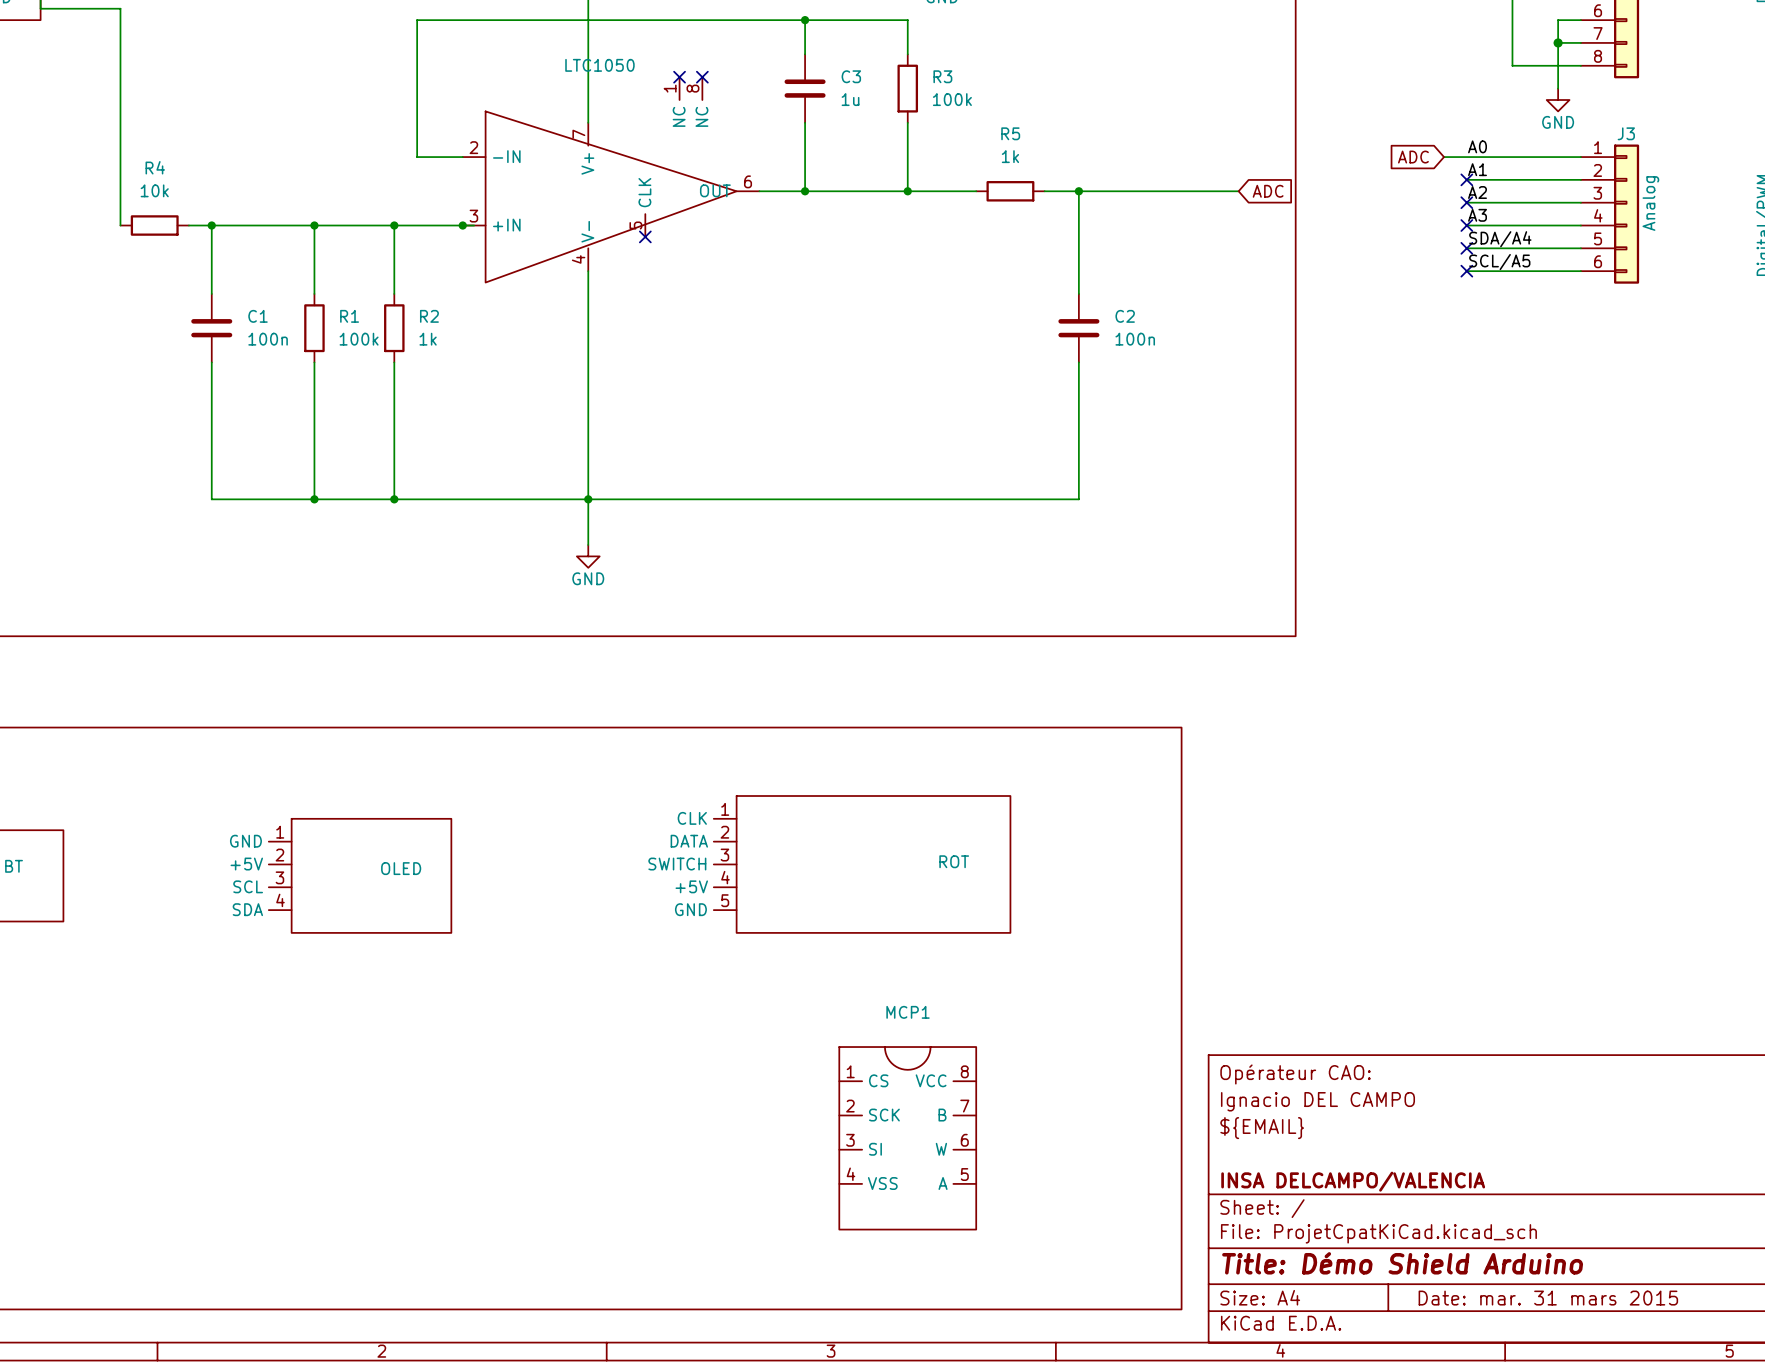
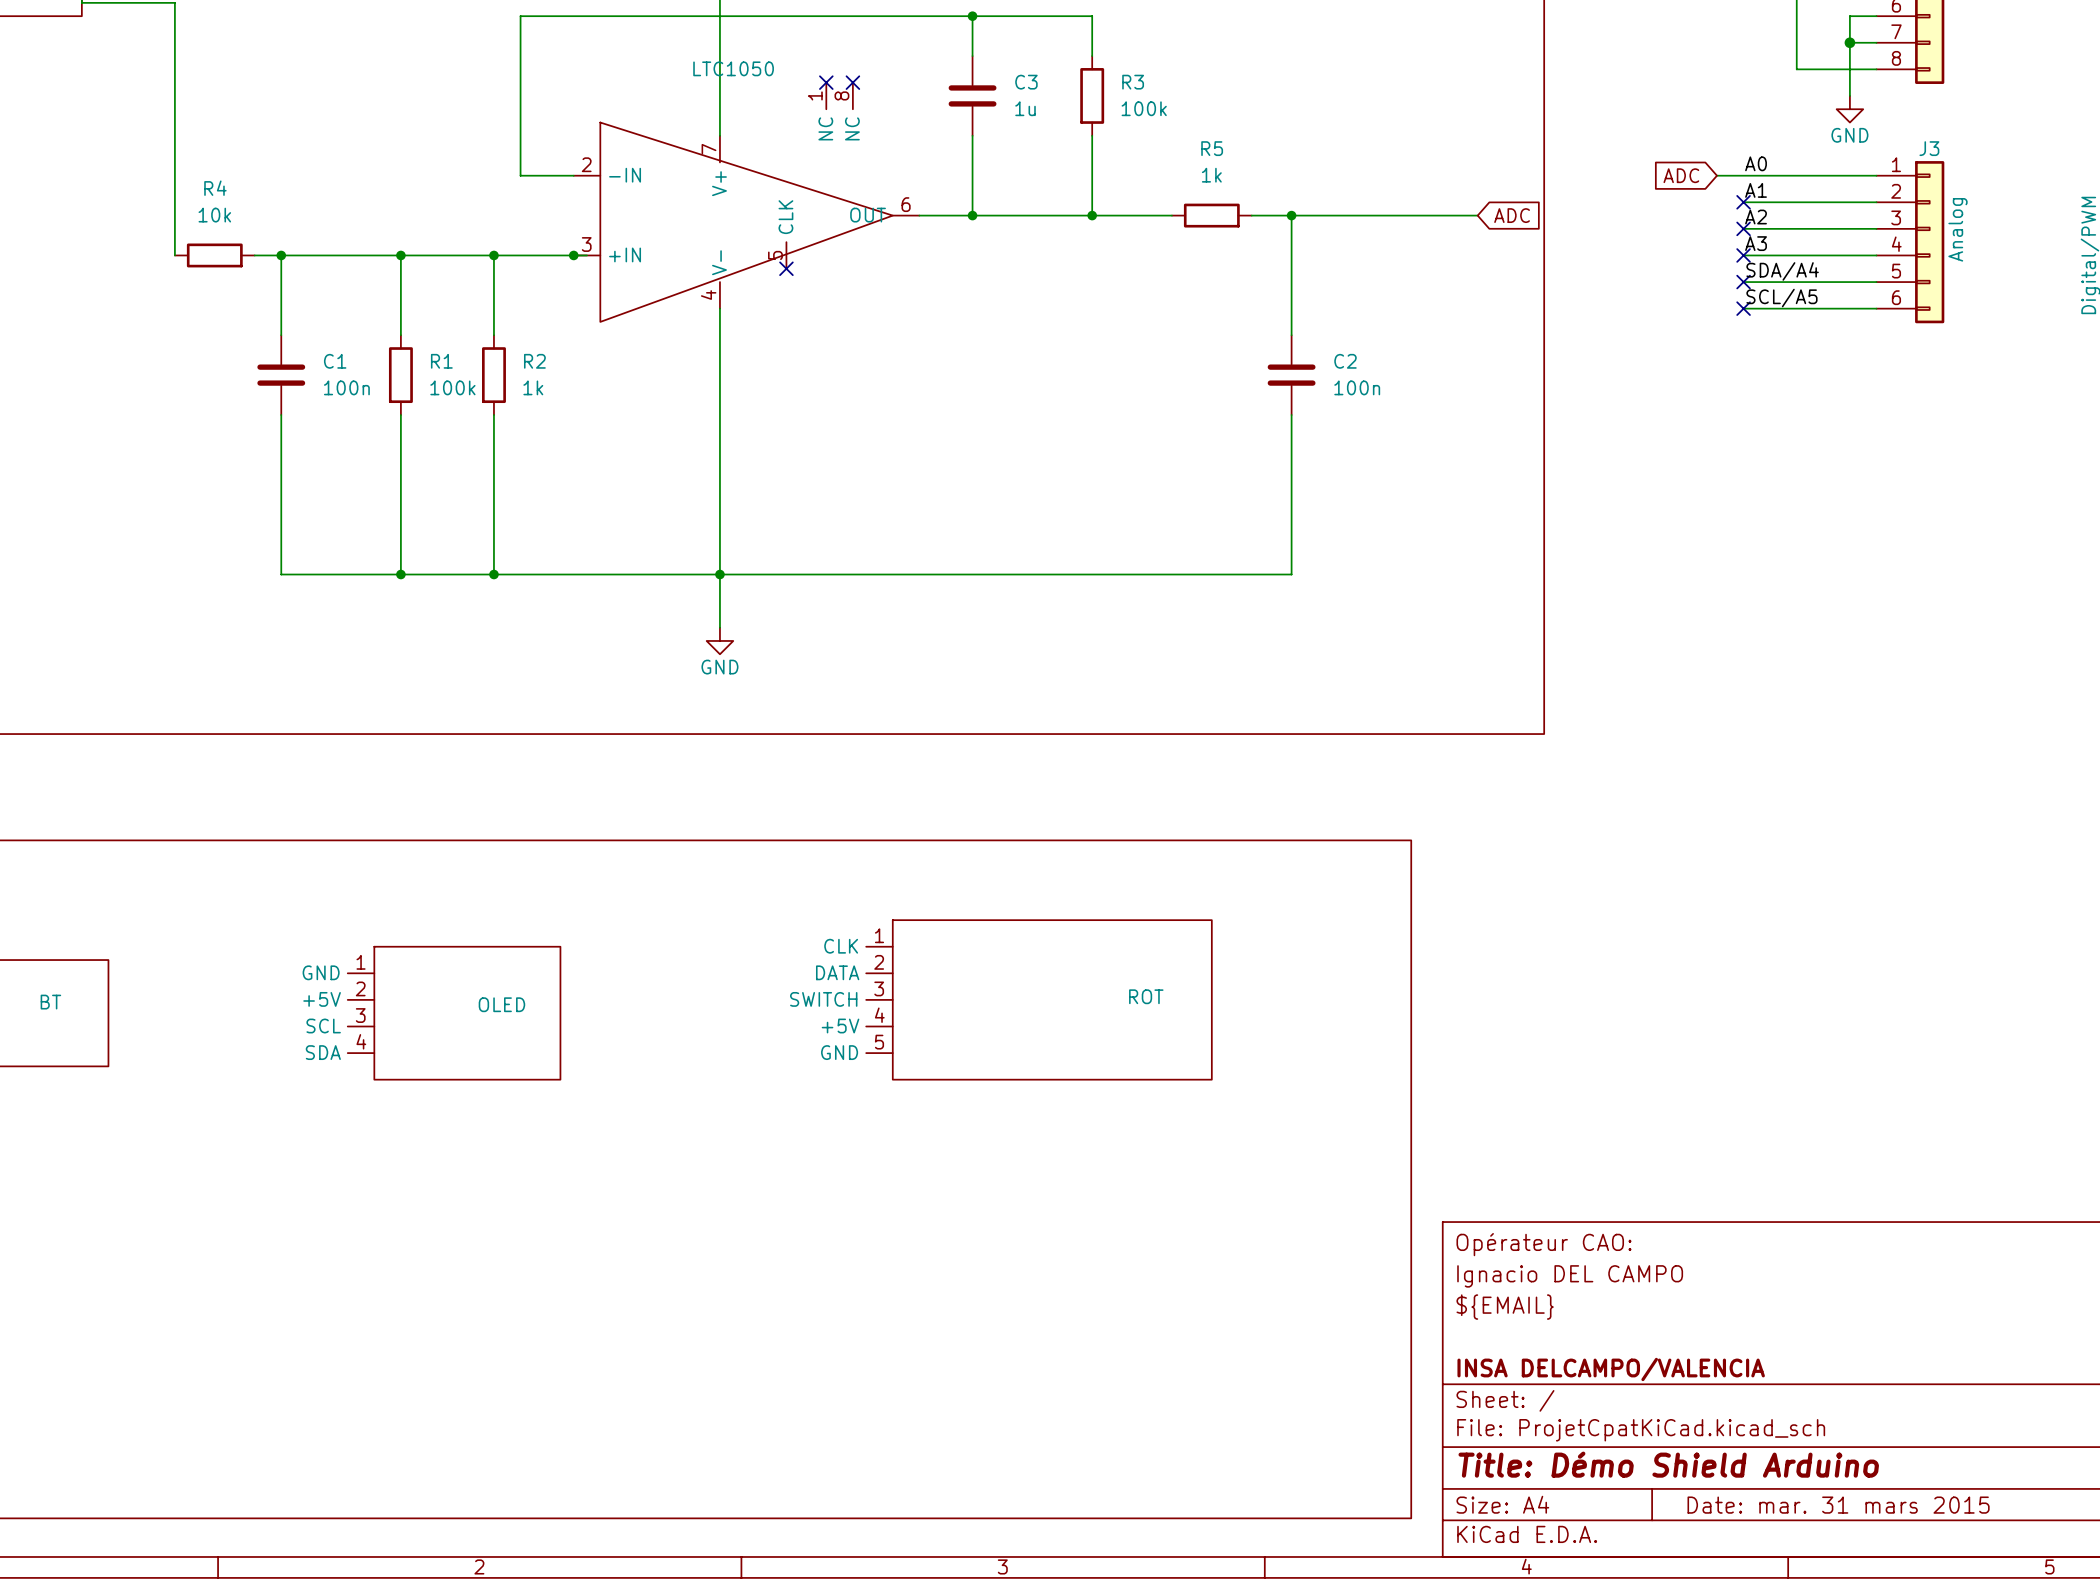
MCP1: (907, 1138) -> none

